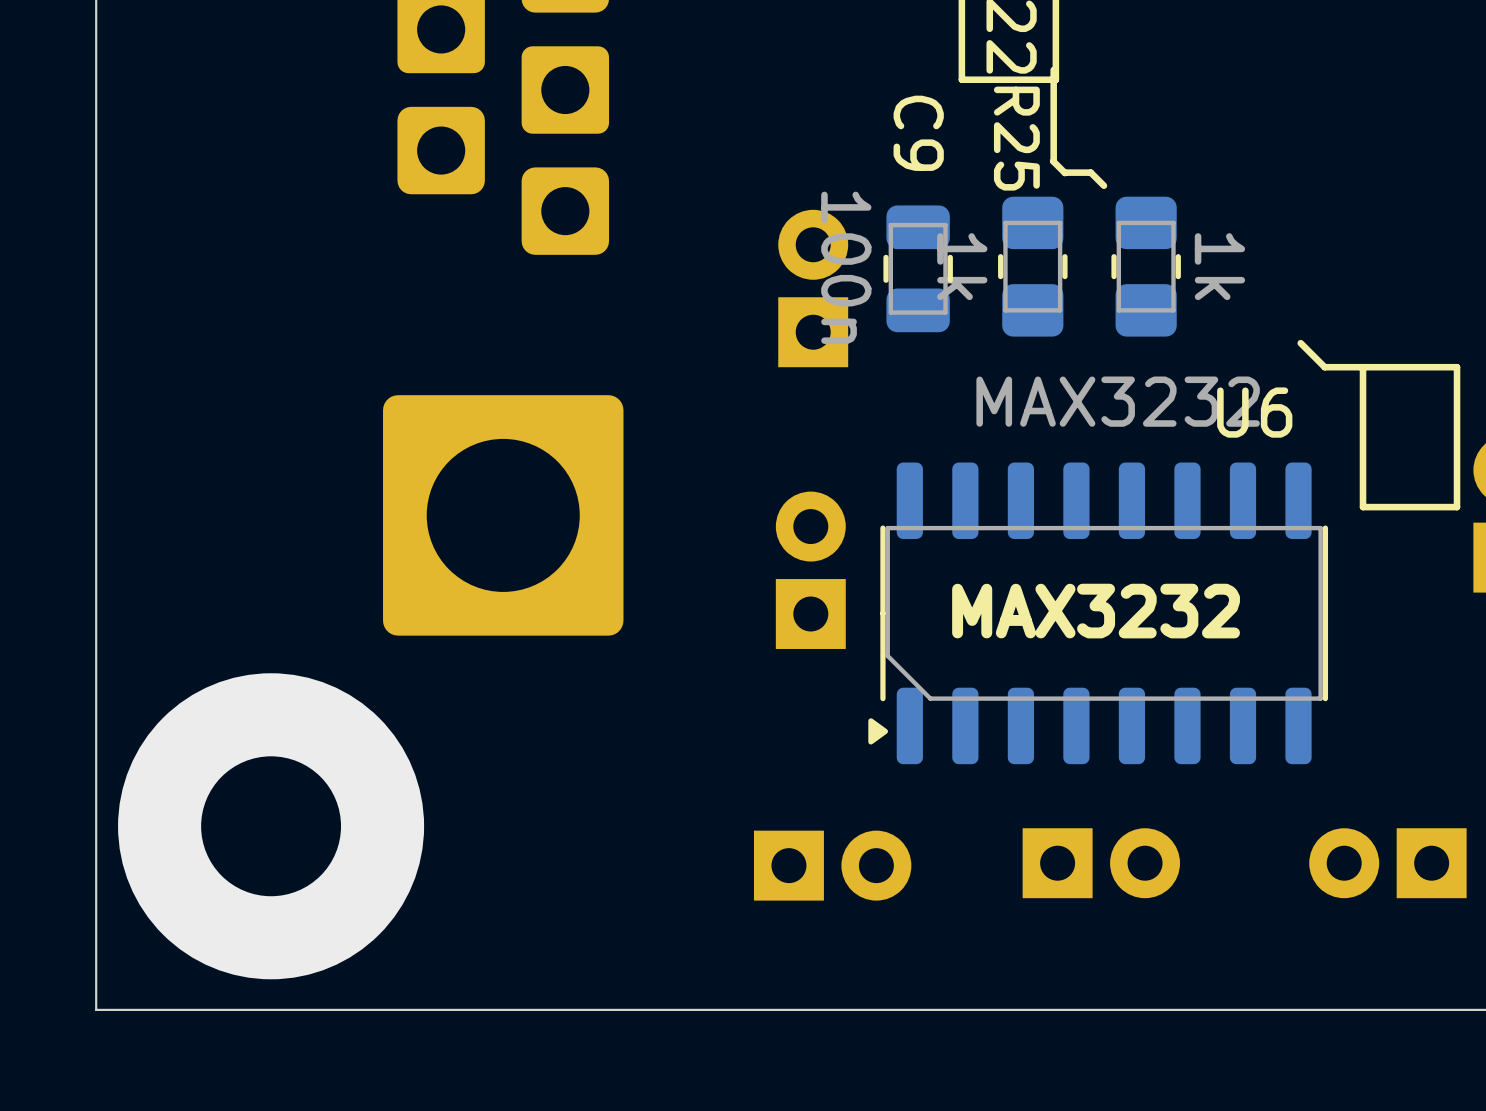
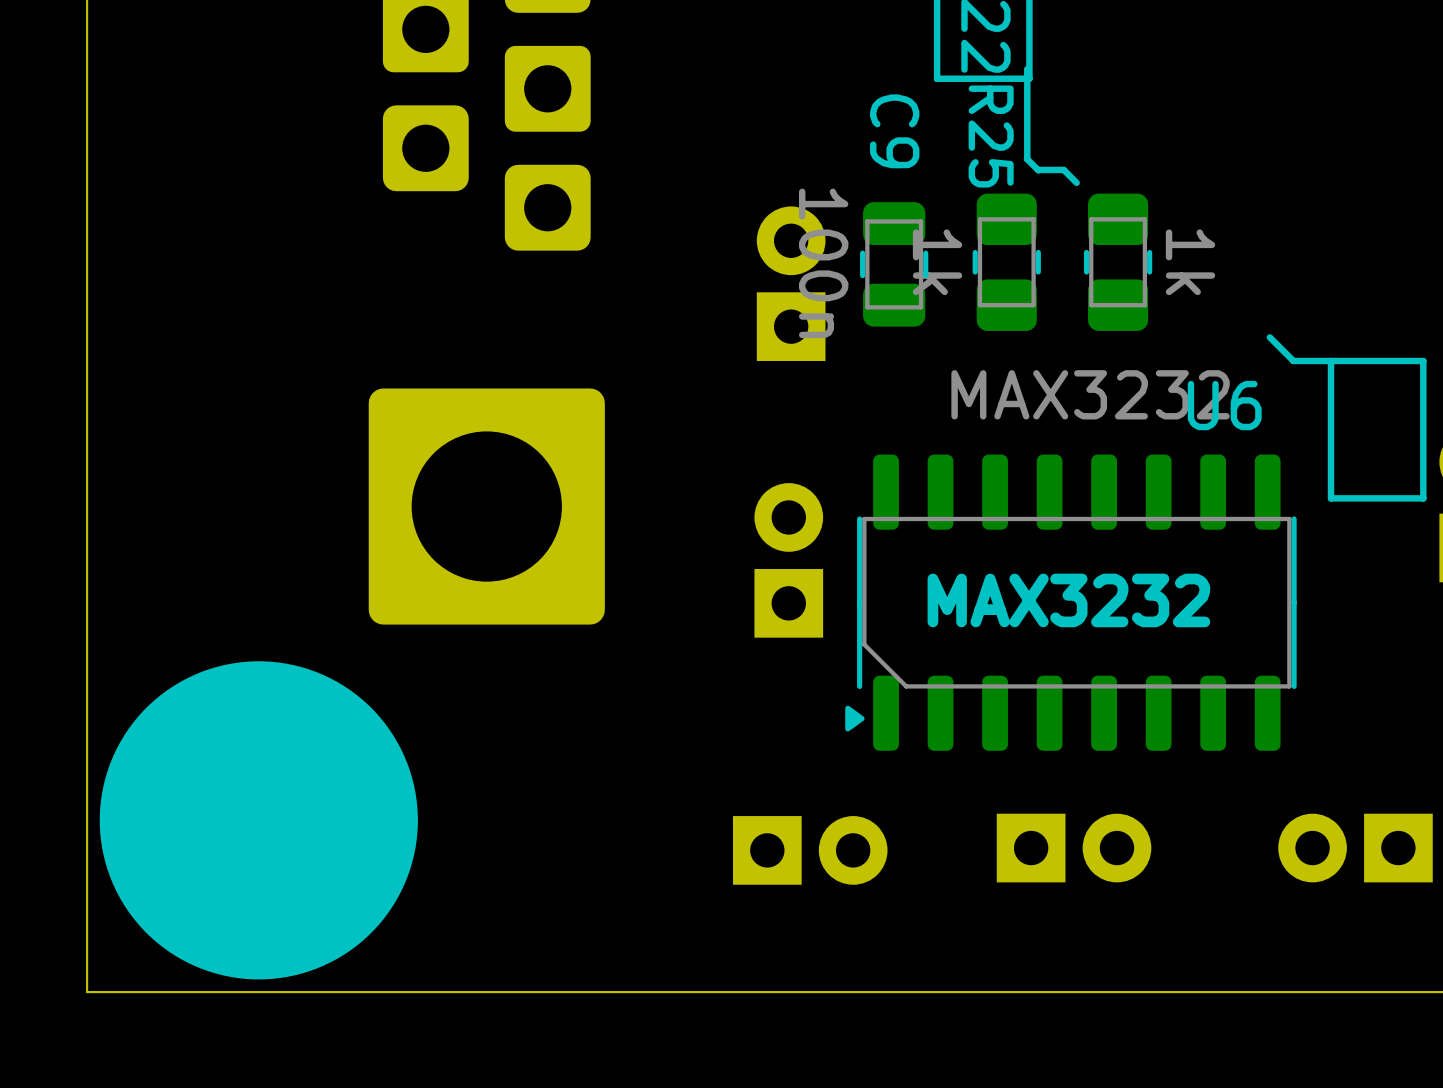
via: (271, 826) -> none
part: none -> (258, 820)

